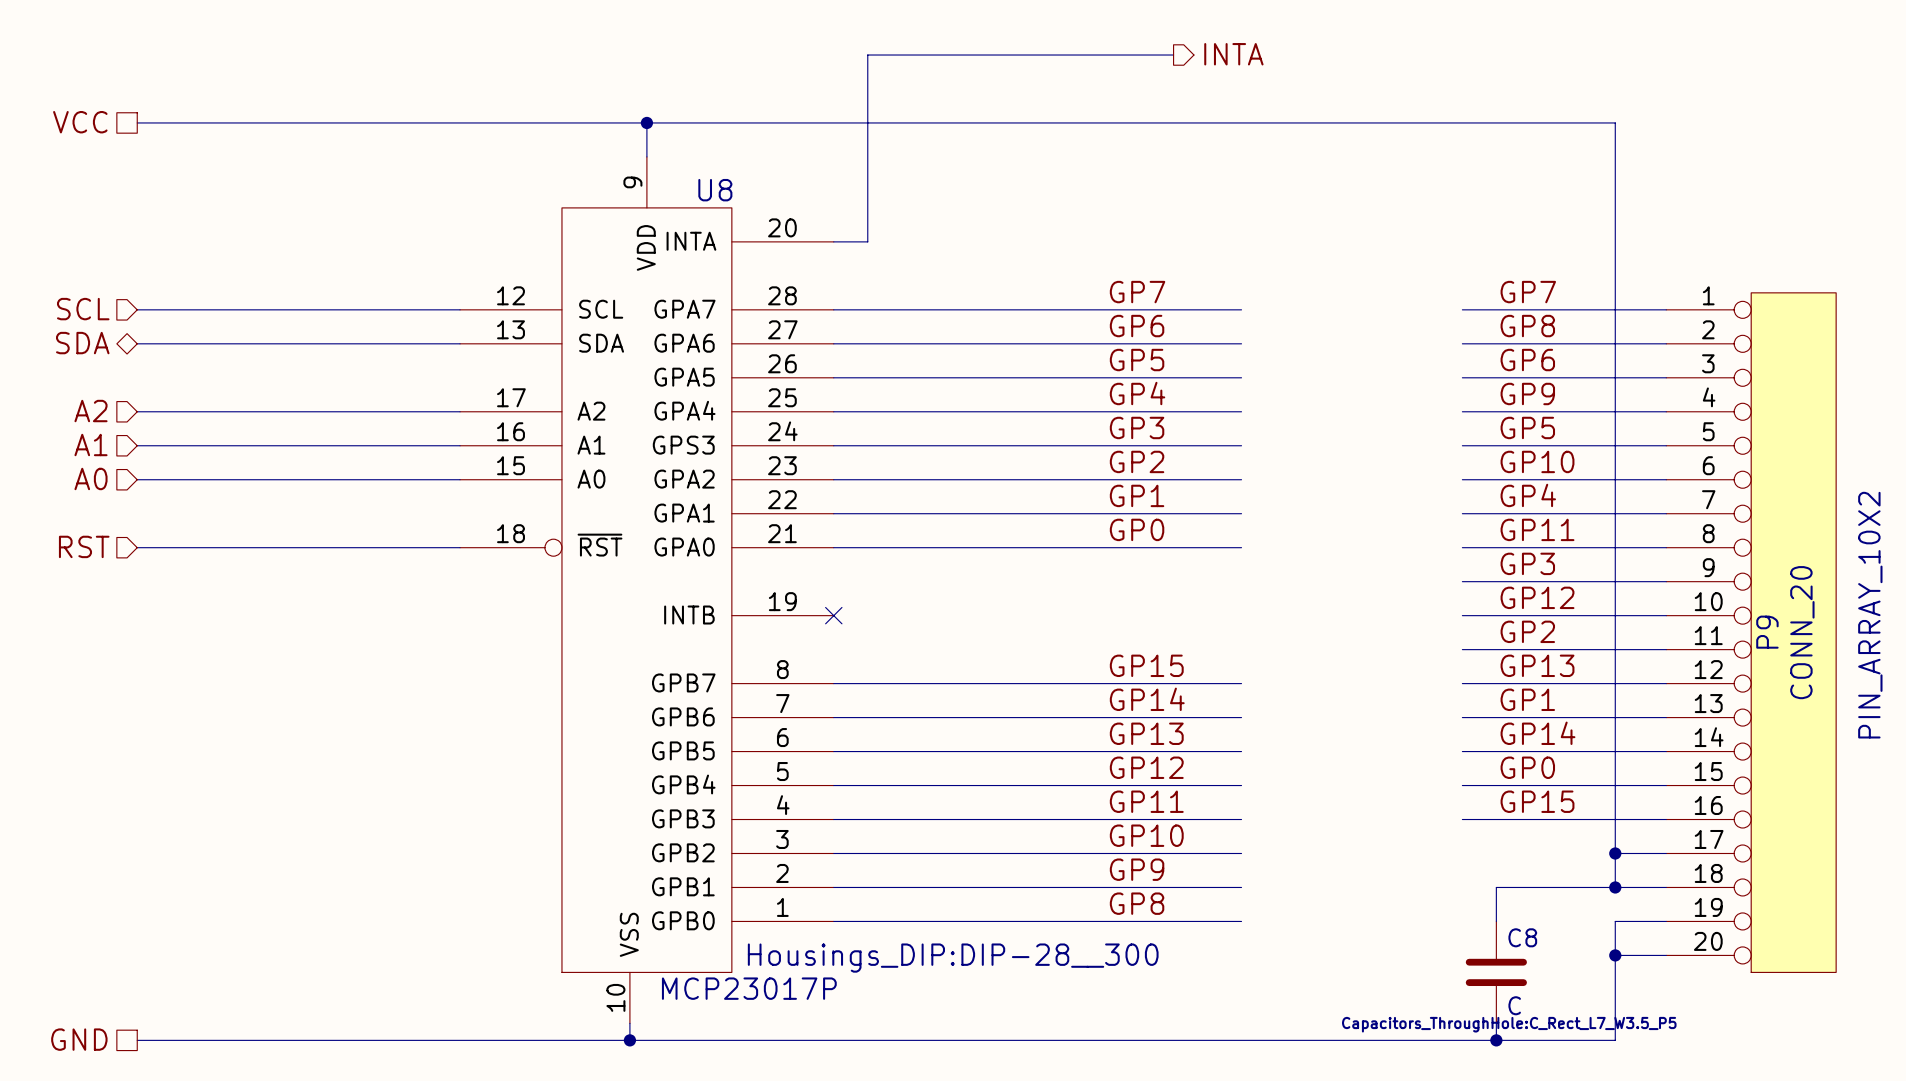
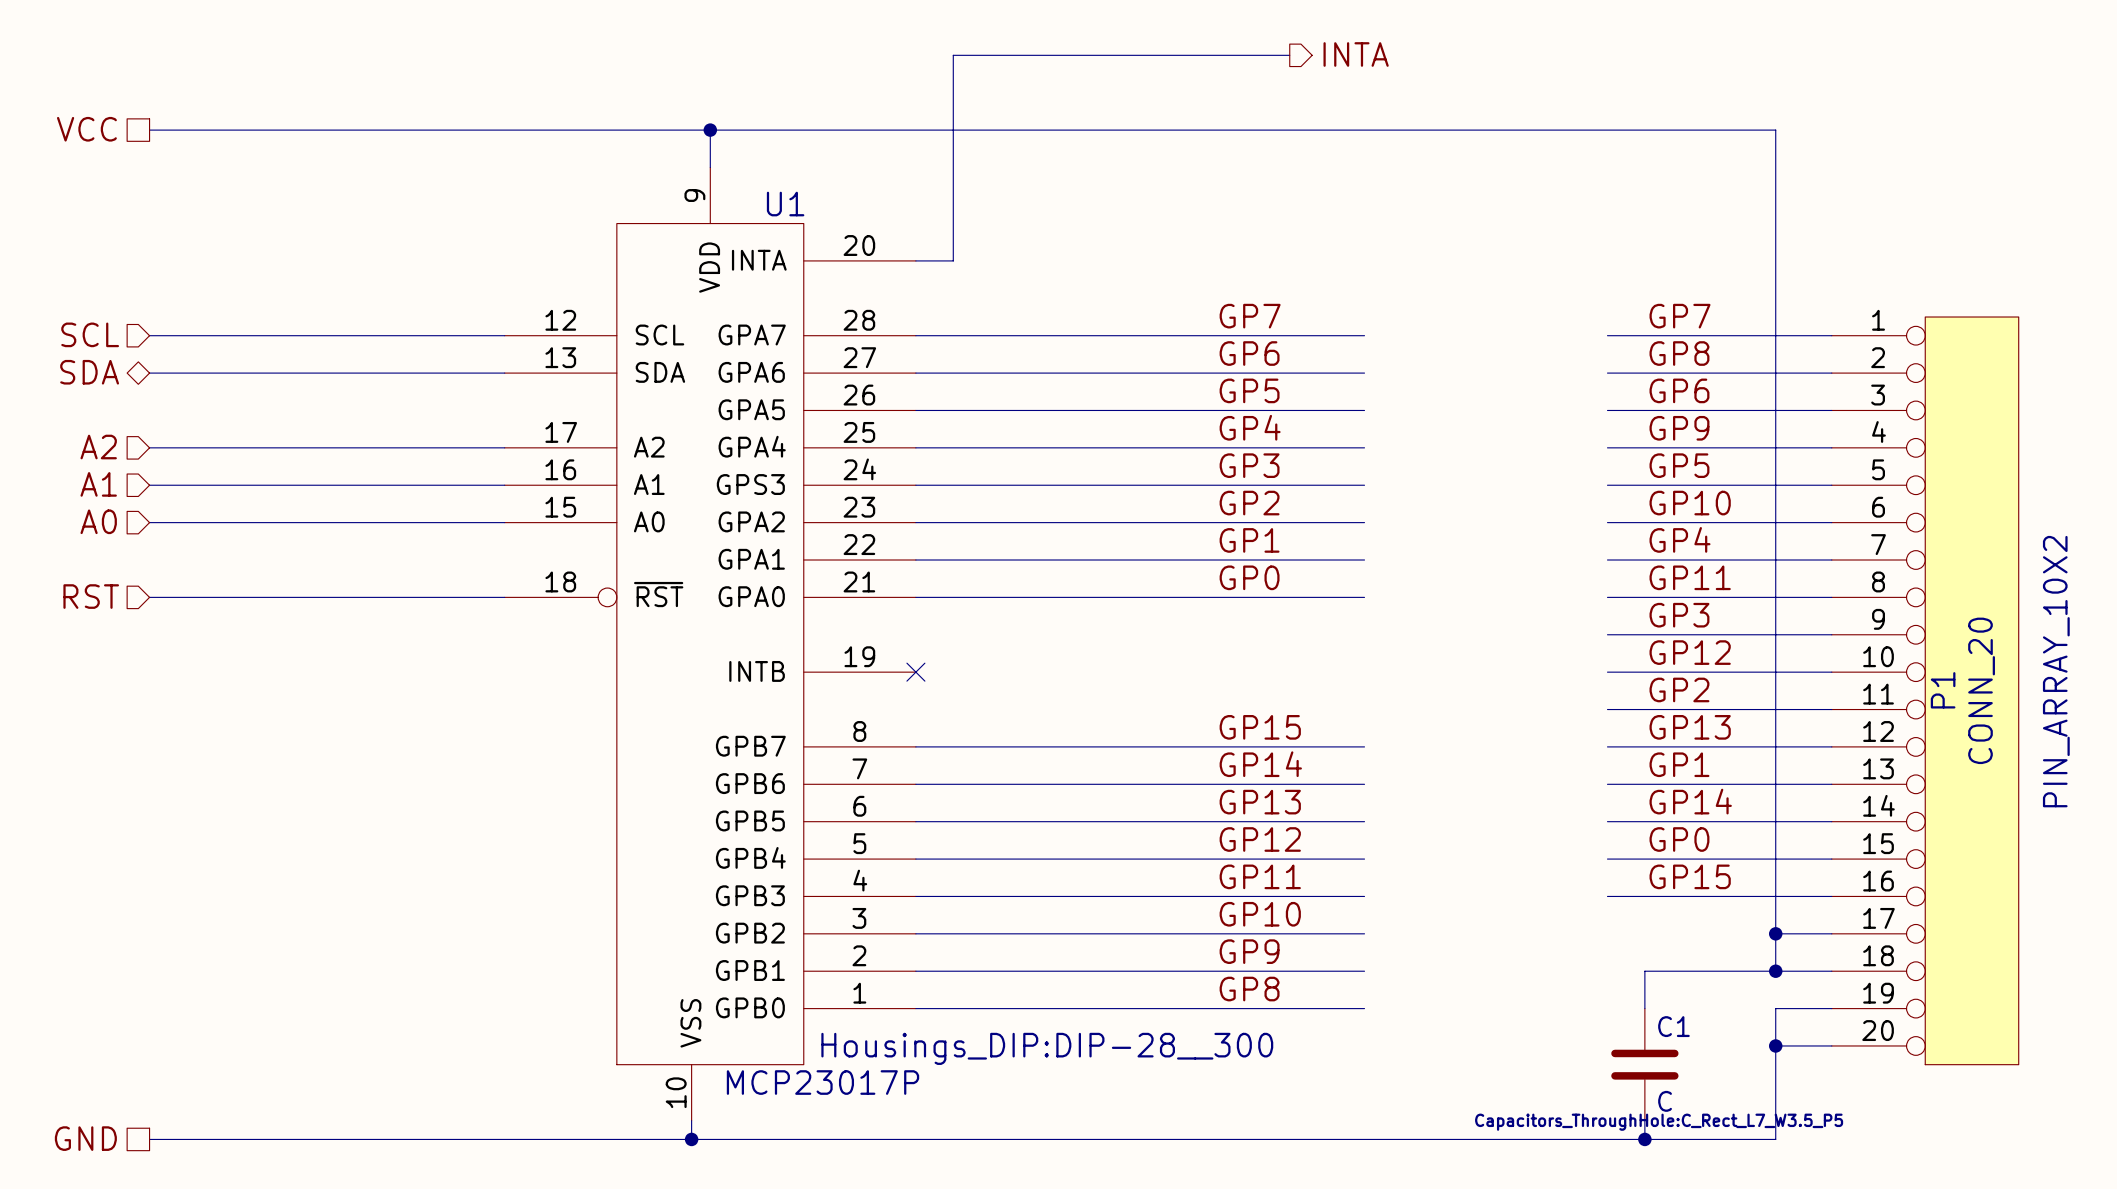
U8 name: U8 (715, 190) -> U1 (785, 204)
P9 name: P9 (1767, 632) -> P1 (1943, 690)
C8 name: C8 (1522, 937) -> C1 (1673, 1026)

